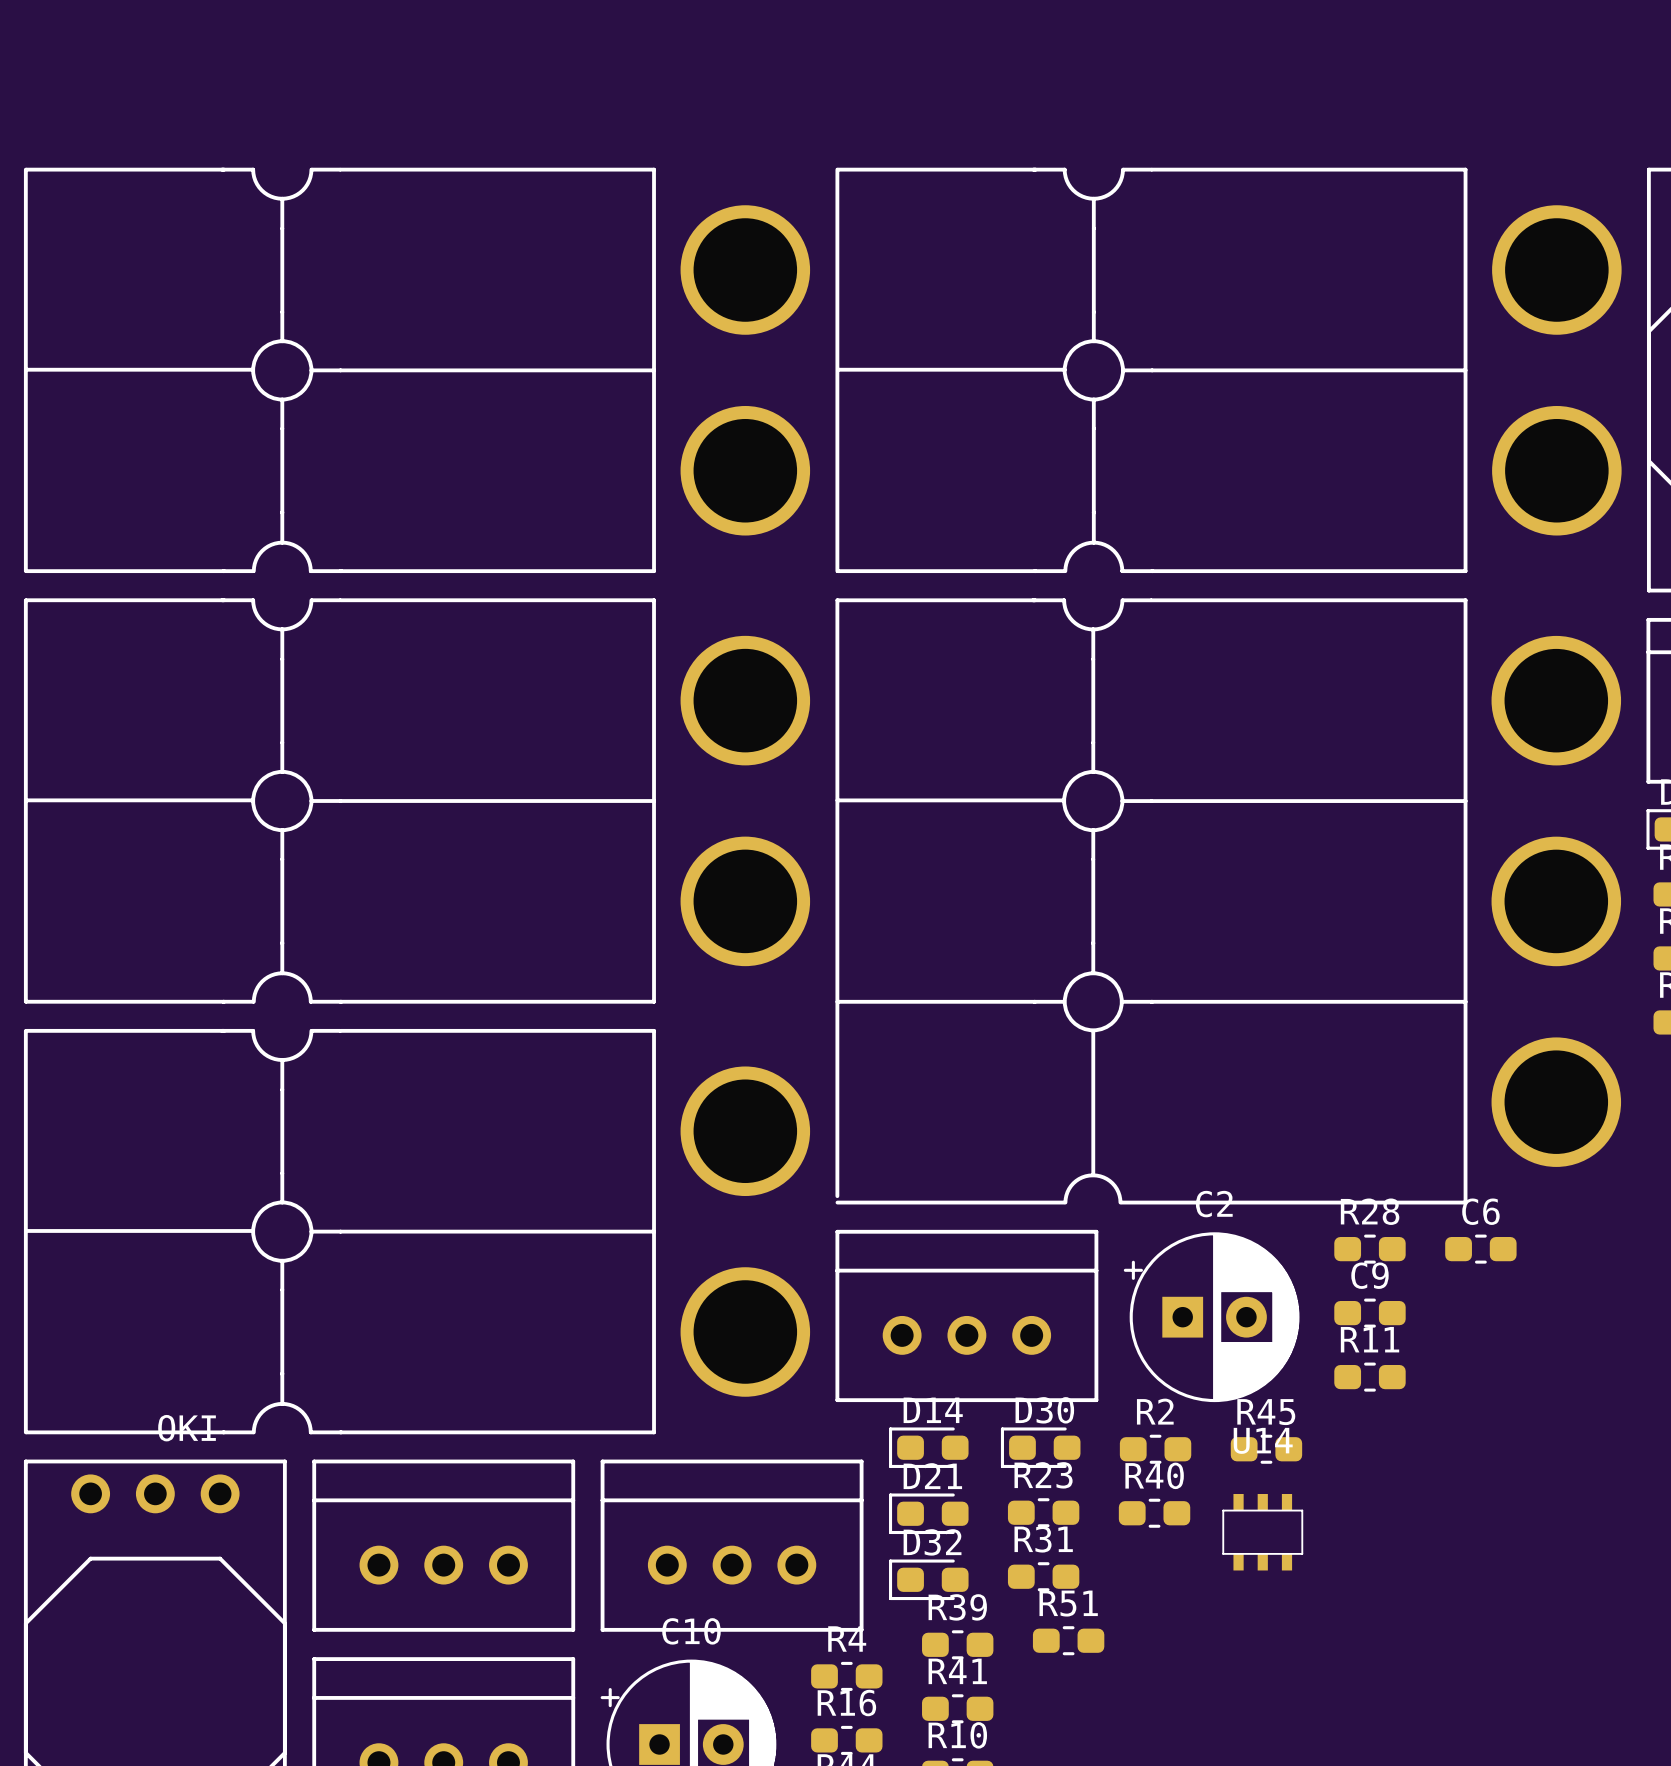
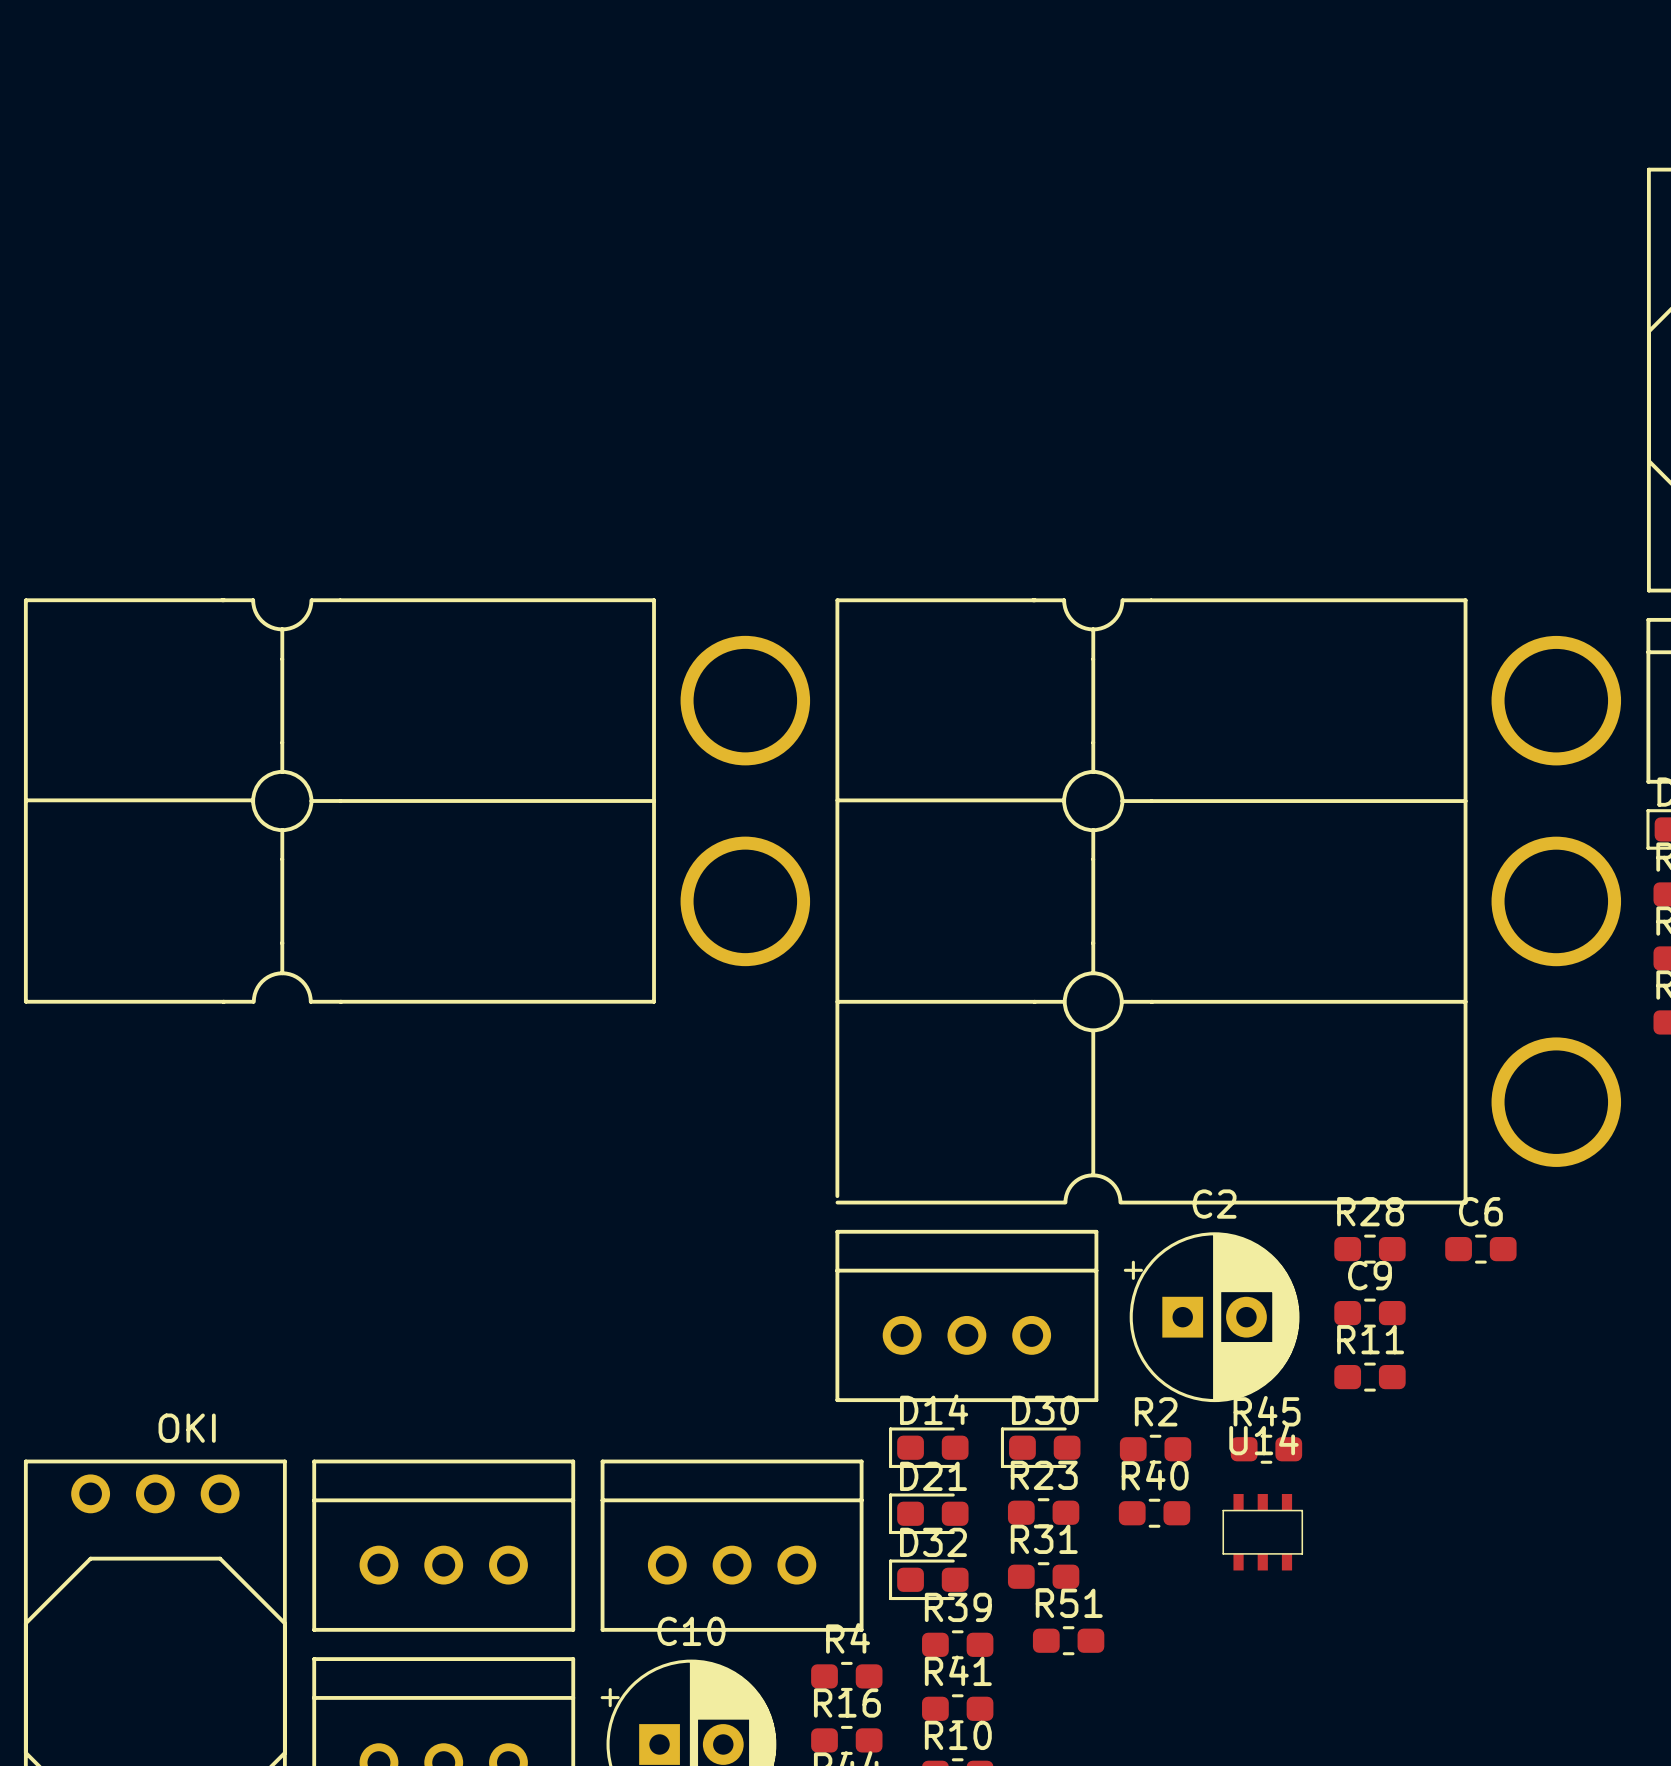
part: (417, 370) -> none
part: (1228, 370) -> none
part: (417, 1231) -> none

